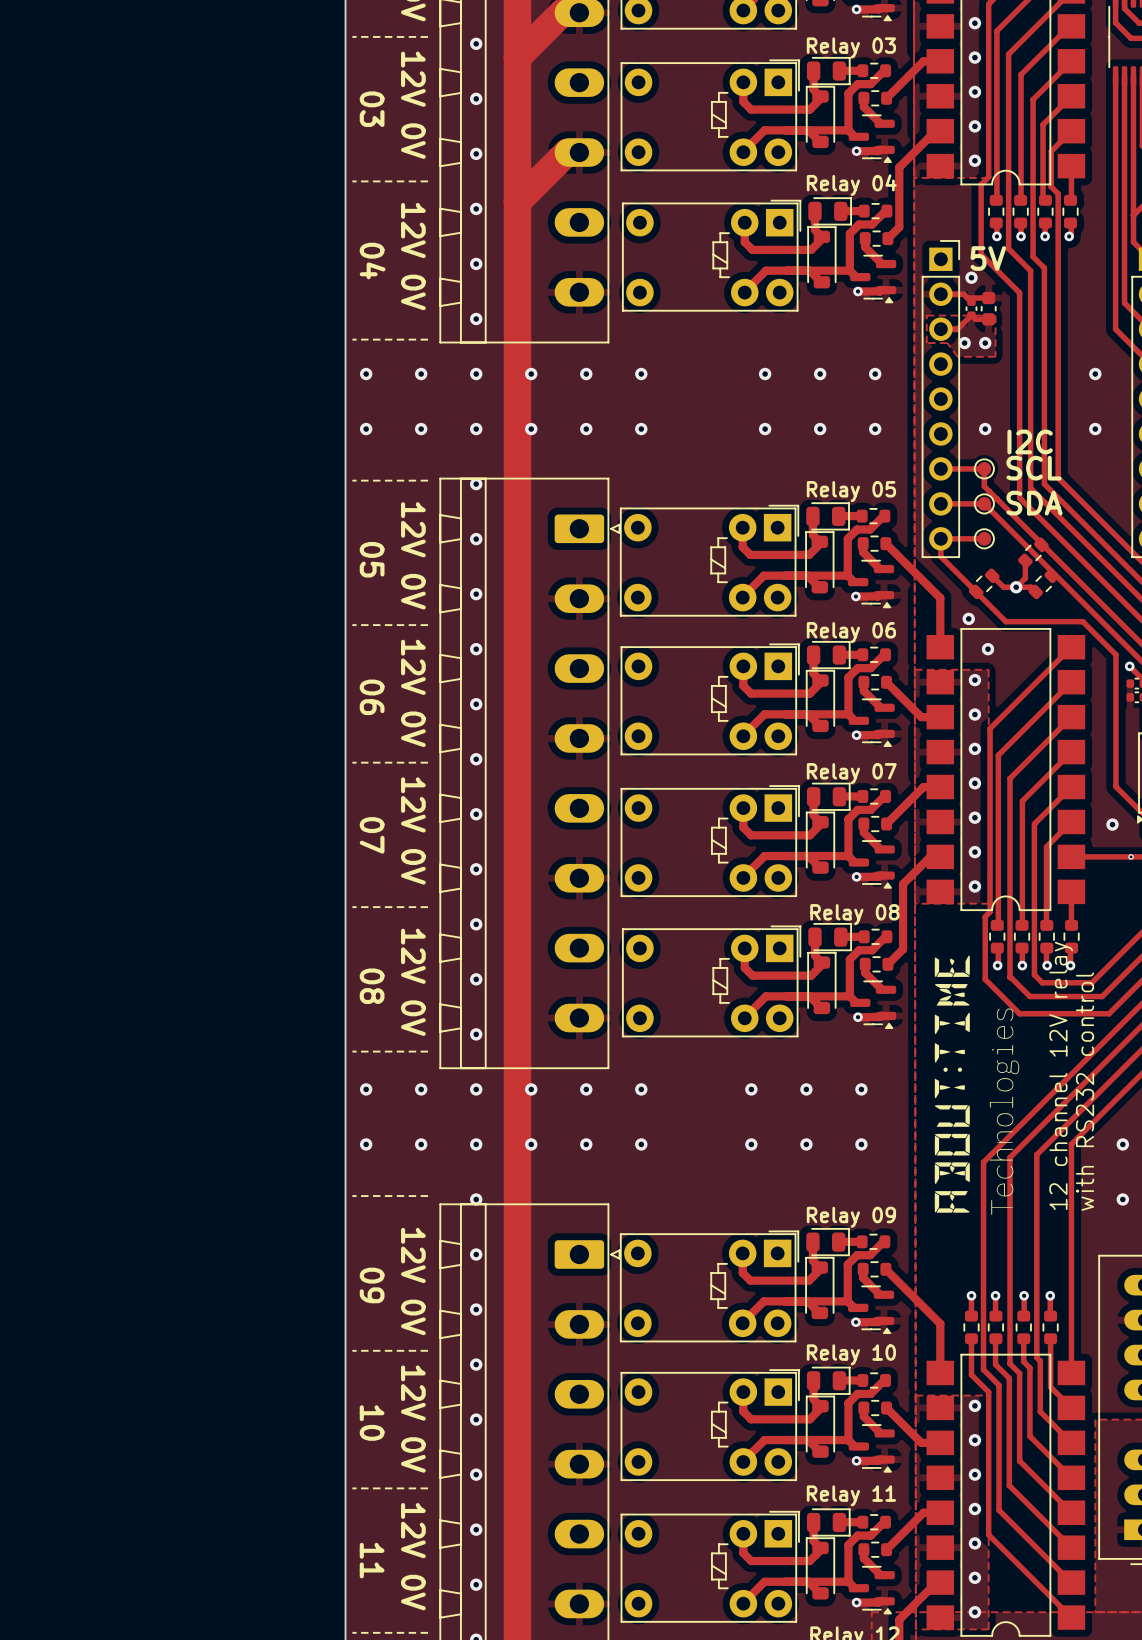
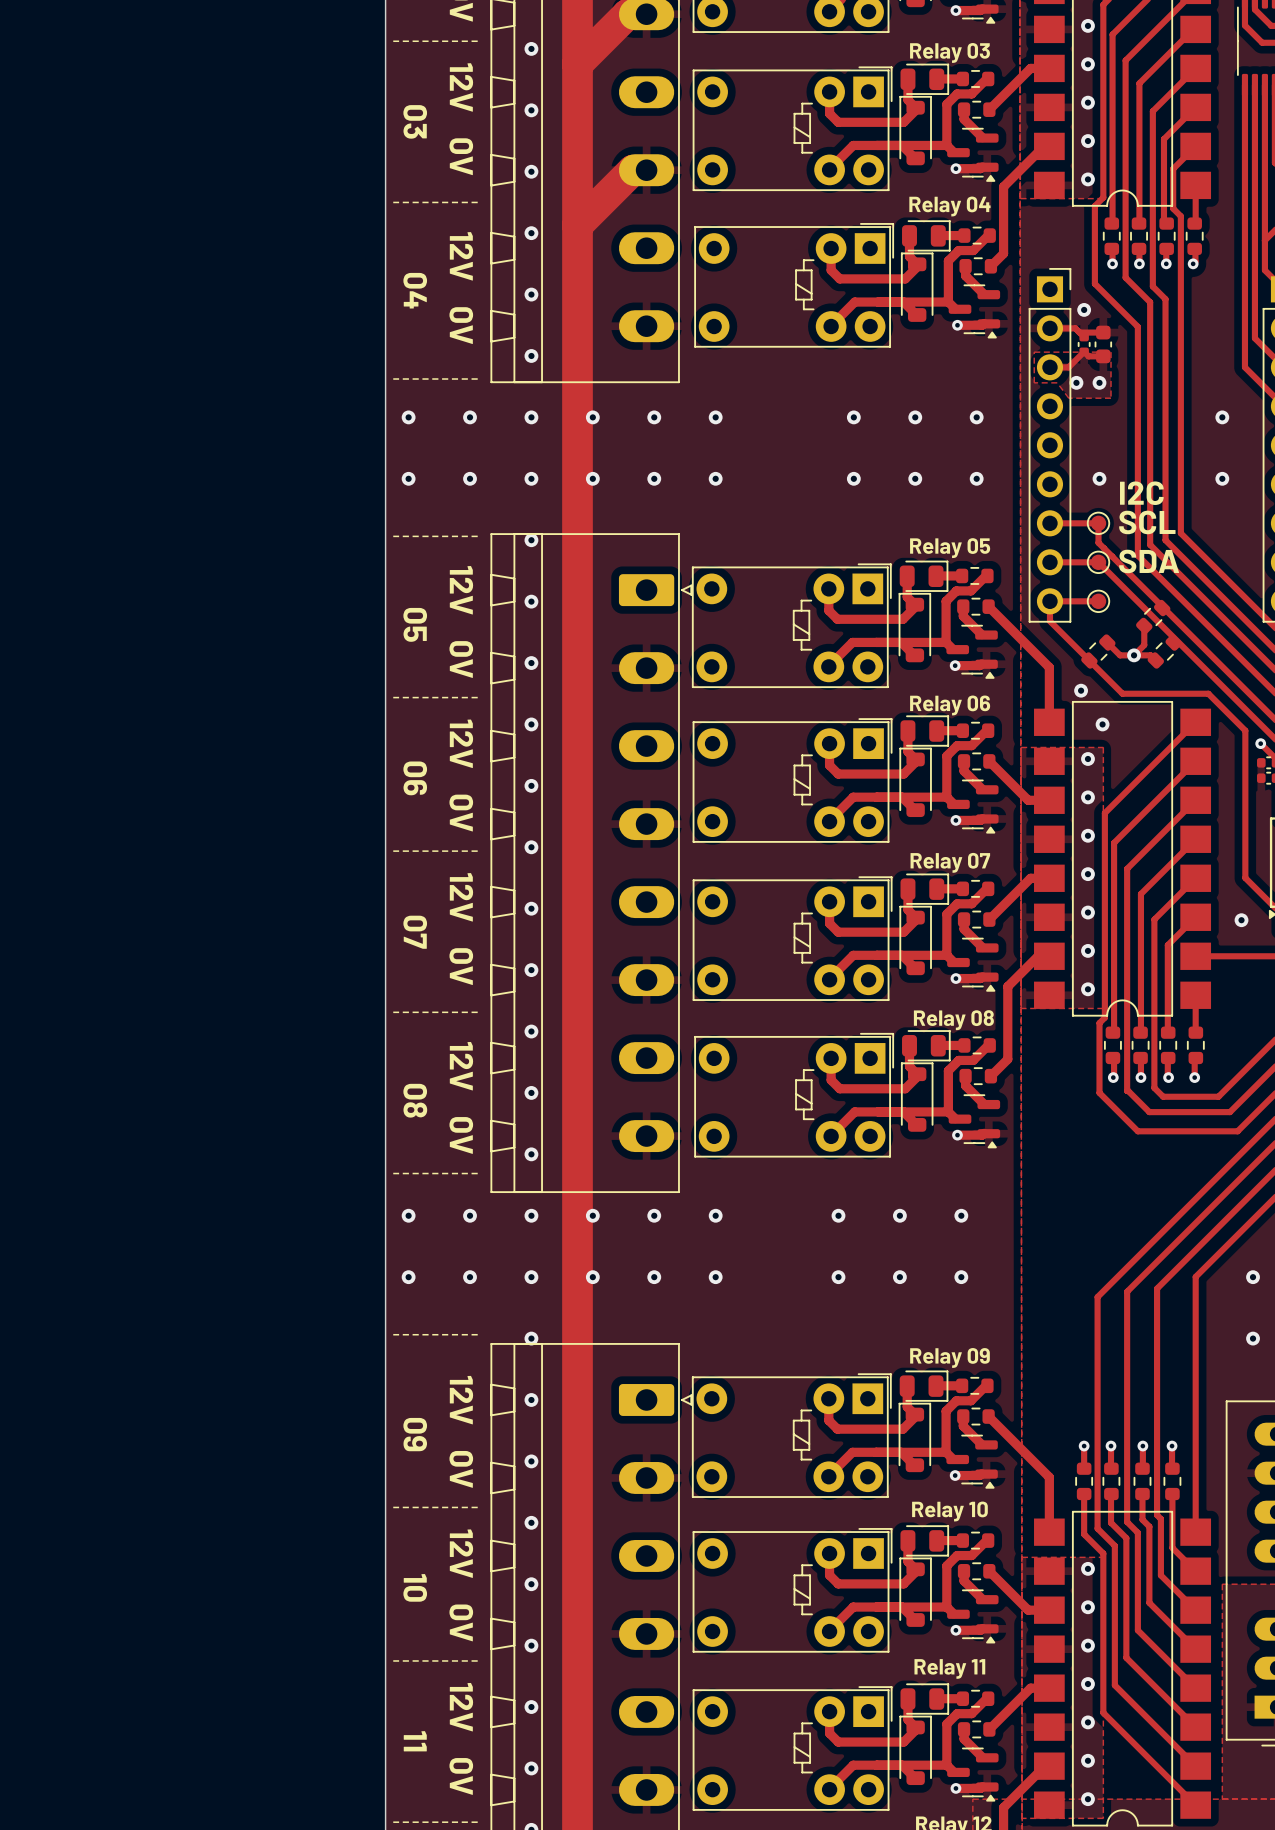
text: 5V (988, 258) -> none
via: (1131, 856) -> none
drawing: [934, 955, 1020, 1215] -> none
text: 12 channel 12V relay (1061, 1075) -> none
text: with RS232 control (1085, 1091) -> none

